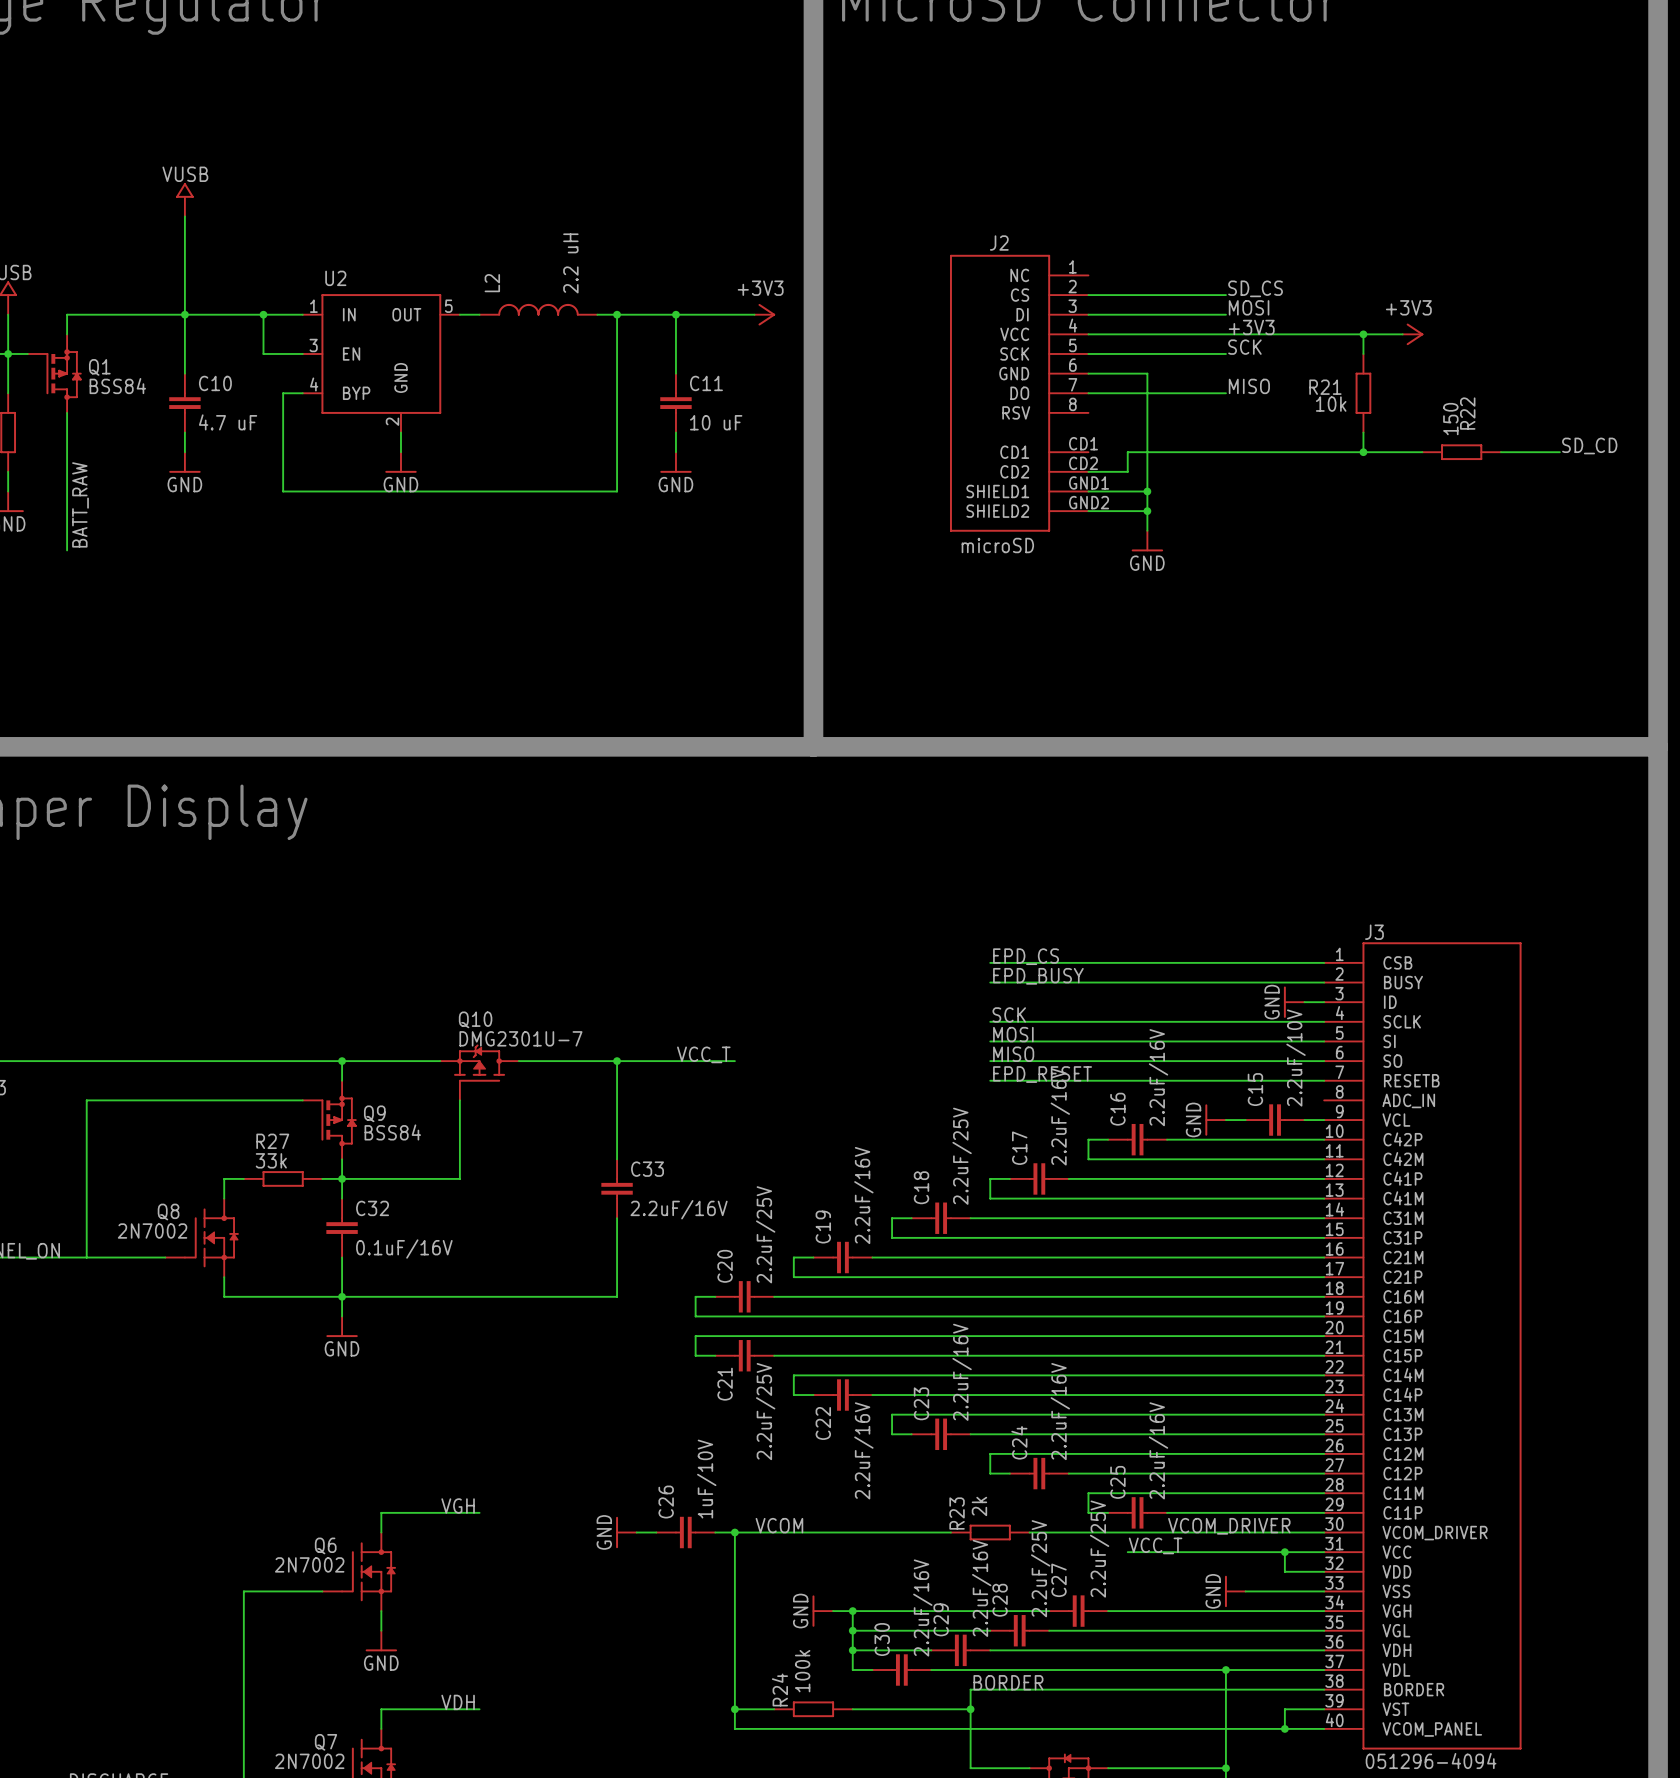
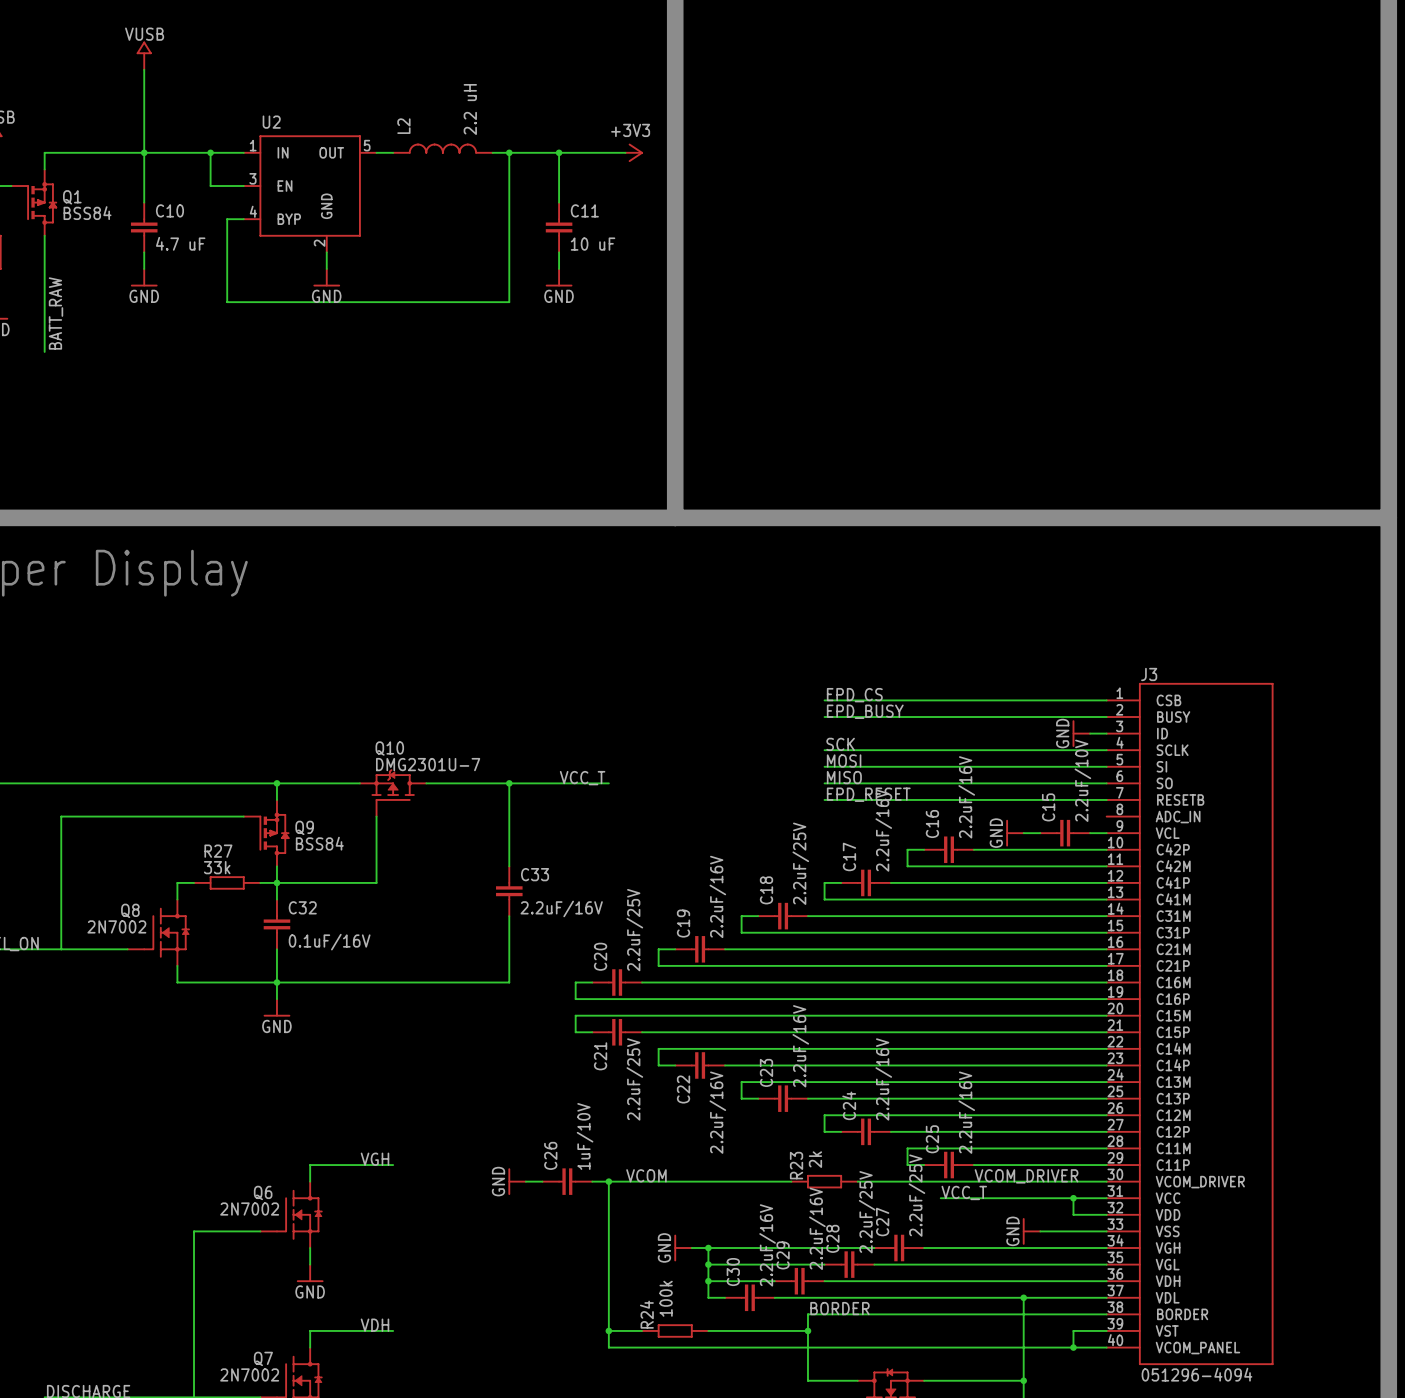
label: SD_CS (1255, 288) -> none
wire: (1088, 295) (1225, 295) -> none
label: MOSI (1249, 307) -> none
wire: (1088, 314) (1225, 314) -> none
label: +3V3 (1251, 327) -> none
wire: (1088, 334) (1402, 334) -> none
wire: (1363, 334) (1363, 353) -> none
junction: (1363, 334) -> none
power symbol: +3V3 (1413, 334) -> none
label: SCK (1244, 347) -> none
wire: (1088, 353) (1225, 353) -> none
wire: (1088, 373) (1147, 373) (1147, 530) -> none
label: MISO (1249, 386) -> none
J2: microSD (1019, 393) -> none
wire: (1088, 393) (1225, 393) -> none
R21: 10k (1363, 393) -> none
wire: (1363, 432) (1363, 452) -> none
label: SD_CD (1589, 445) -> none
junction: (1363, 452) -> none
wire: (1422, 452) (1127, 452) (1127, 471) (1088, 471) -> none
R22: 150 (1461, 452) -> none
wire: (1500, 452) (1559, 452) -> none
wire: (1088, 491) (1147, 491) -> none
junction: (1147, 491) -> none
wire: (1088, 511) (1147, 511) -> none
junction: (1147, 511) -> none
power symbol: GND (1147, 541) -> none

